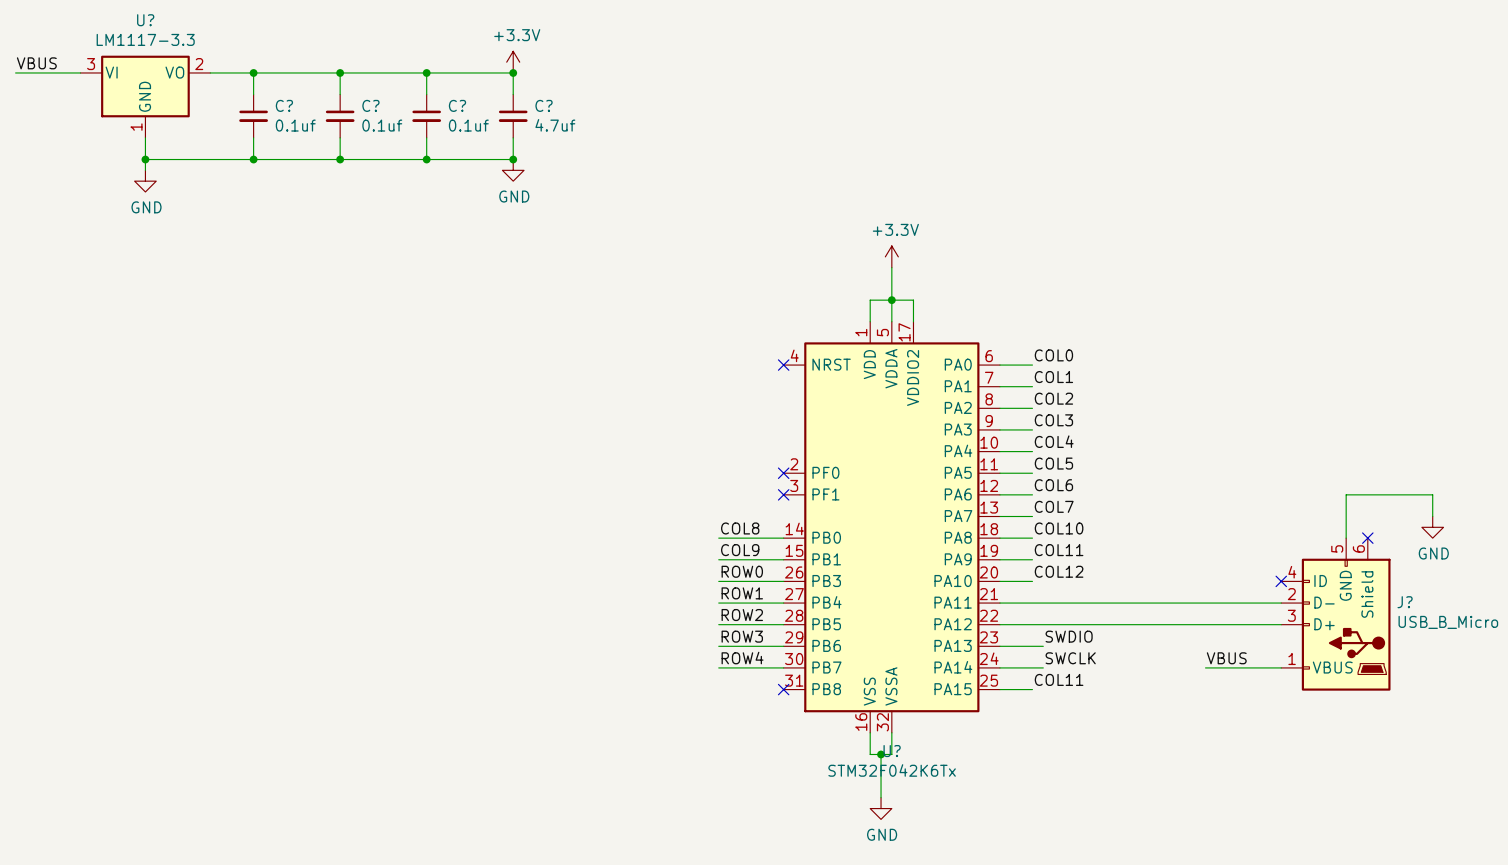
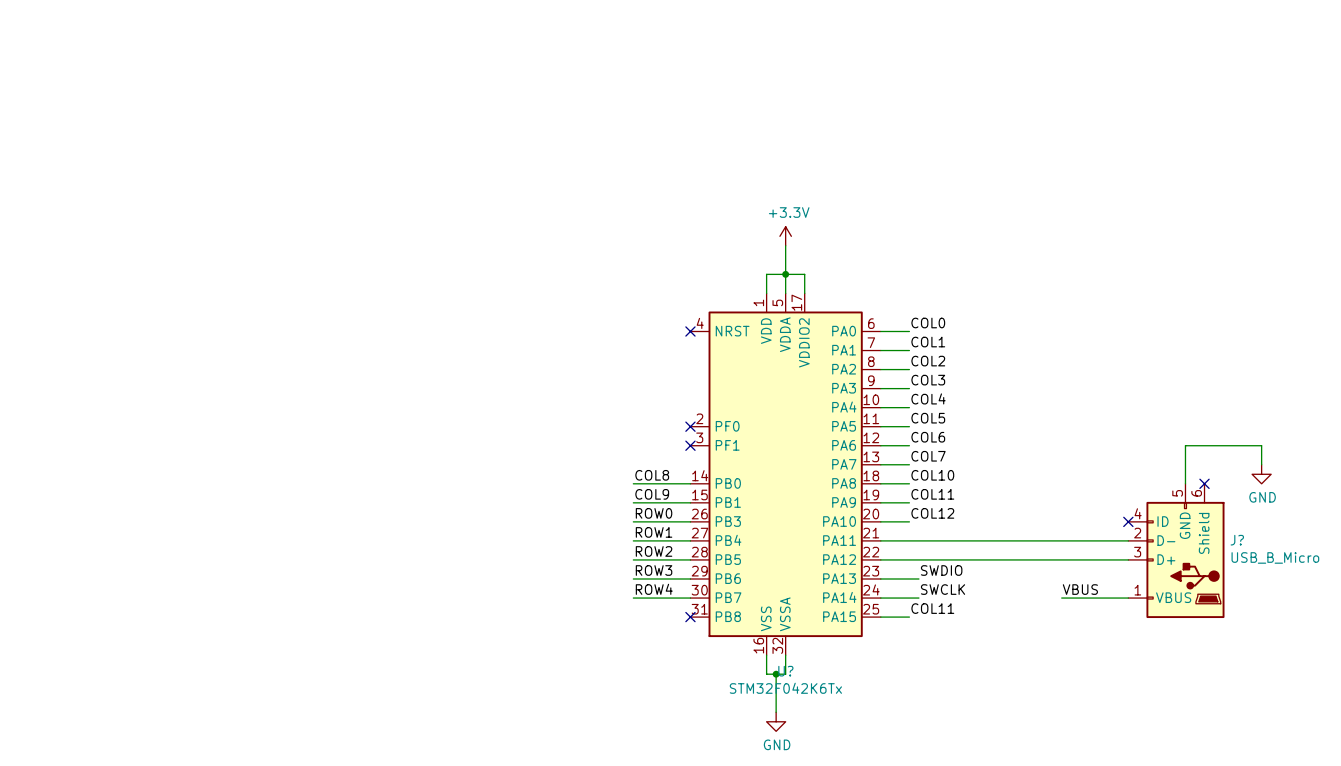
power symbol: +3.3V (513, 62) -> none
label: VBUS (36, 63) -> none
wire: (15, 72) (80, 72) -> none
wire: (210, 72) (513, 72) (513, 94) -> none
wire: (253, 72) (253, 94) -> none
junction: (253, 72) -> none
wire: (340, 72) (340, 94) -> none
junction: (340, 72) -> none
wire: (426, 72) (426, 94) -> none
junction: (426, 72) -> none
junction: (513, 72) -> none
U?: LM1117-3.3 (145, 96) -> none
C?: 0.1uf (253, 116) -> none
C?: 0.1uf (340, 116) -> none
C?: 0.1uf (426, 116) -> none
C?: 4.7uf (513, 116) -> none
wire: (145, 137) (145, 170) -> none
wire: (253, 137) (253, 159) -> none
wire: (340, 137) (340, 159) -> none
wire: (426, 137) (426, 159) -> none
wire: (513, 137) (513, 159) (145, 159) -> none
junction: (145, 159) -> none
junction: (253, 159) -> none
junction: (340, 159) -> none
junction: (426, 159) -> none
junction: (513, 159) -> none
power symbol: GND (513, 170) -> none
power symbol: GND (145, 181) -> none

